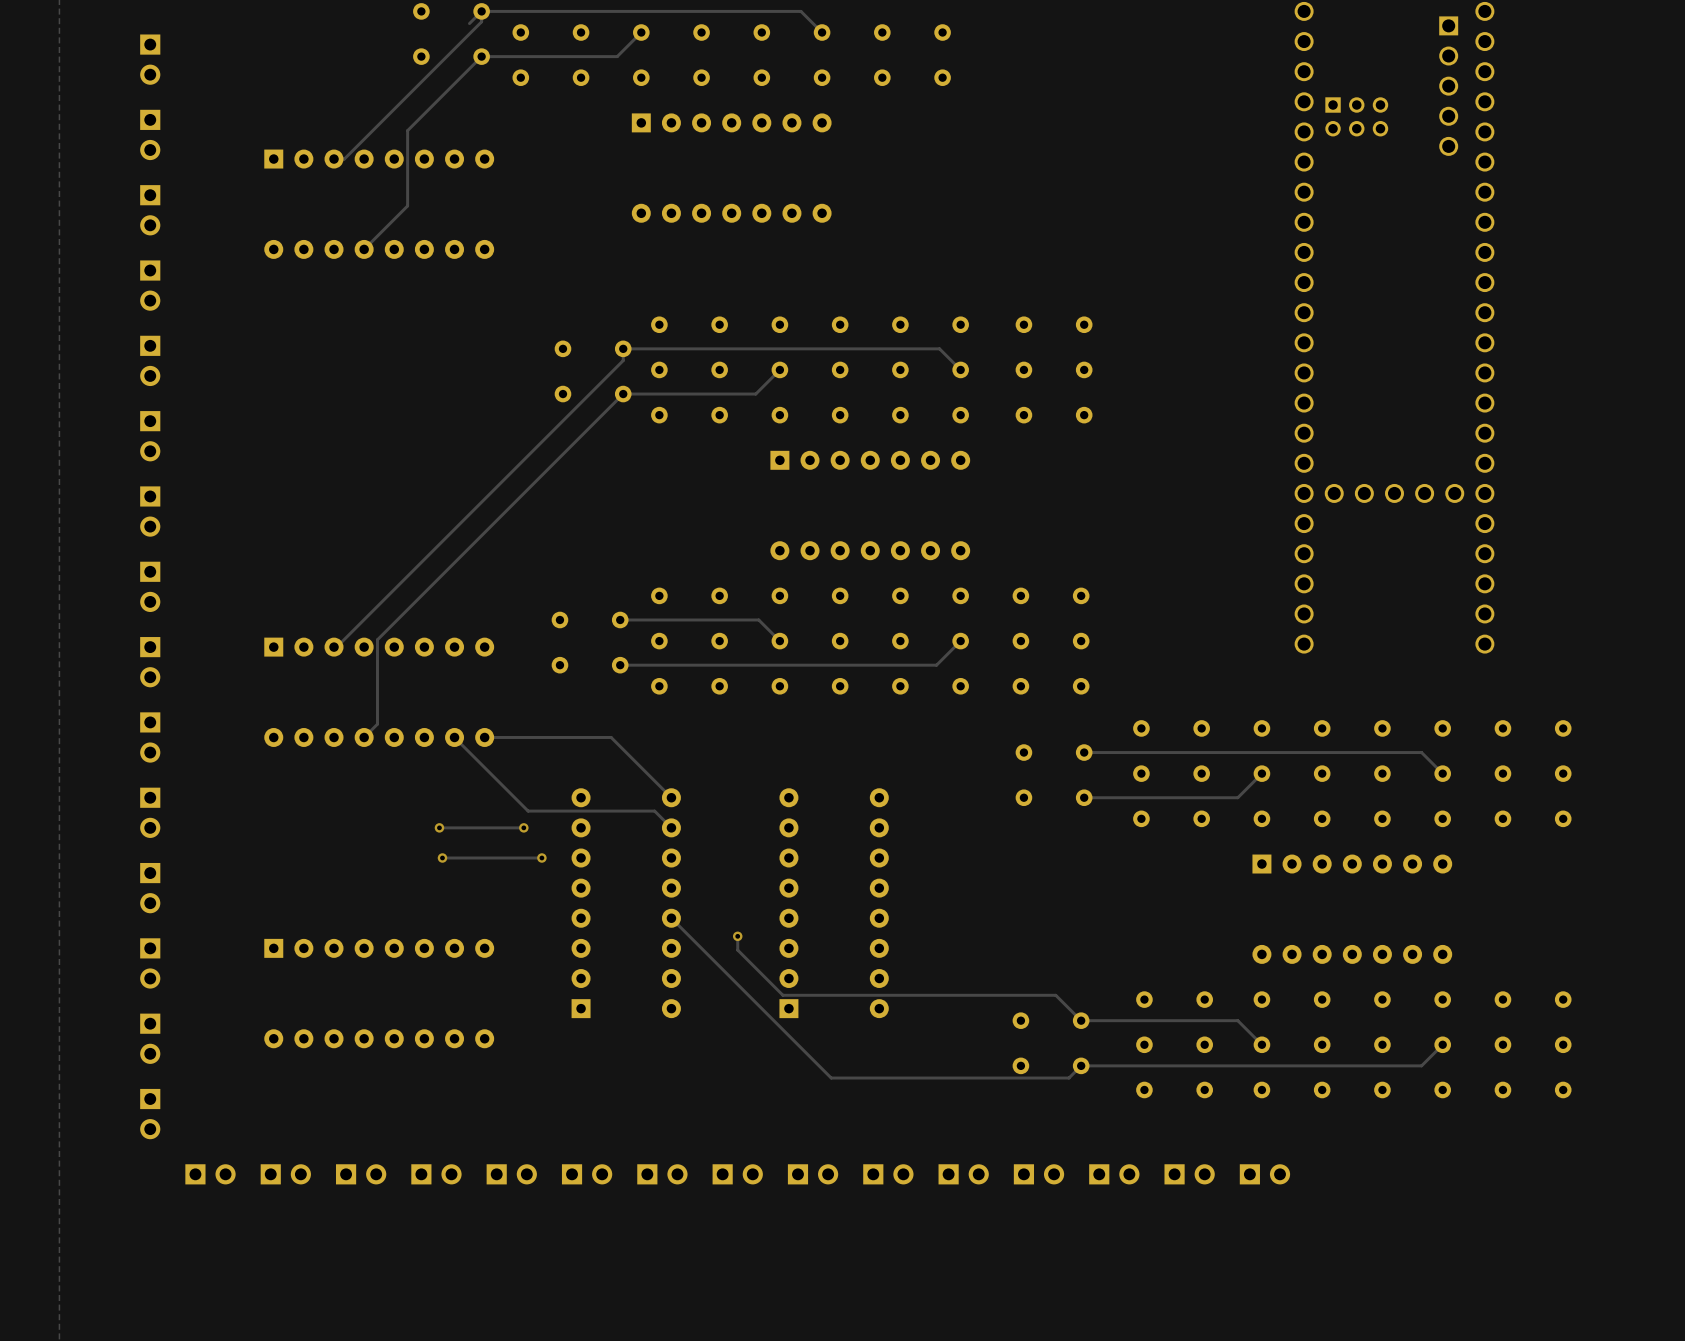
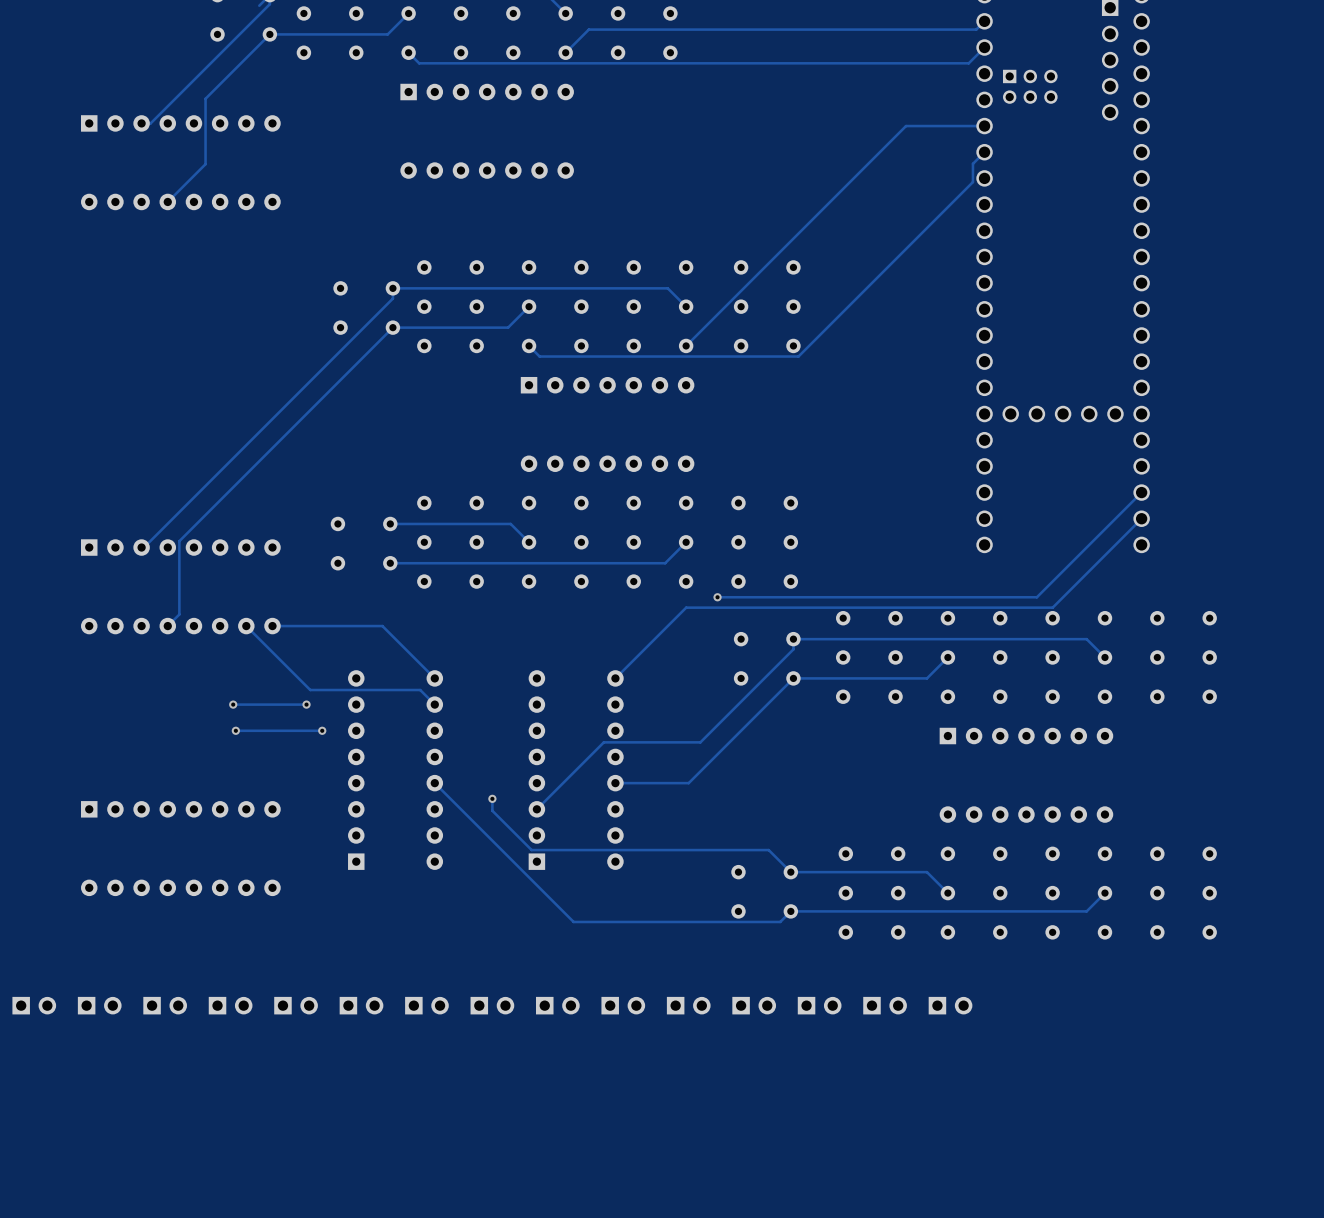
track: none -> (984, 21) (976, 29) (588, 29) (565, 52)
track: none -> (984, 47) (968, 63) (419, 63) (408, 52)
track: none -> (984, 126) (906, 126) (686, 345)
track: none -> (984, 152) (972, 163) (972, 182) (798, 356) (539, 356) (529, 345)
track: none -> (1141, 492) (1036, 597) (717, 597)
track: none -> (1141, 518) (1052, 607) (686, 607) (615, 678)
via: none -> (717, 597)
track: none -> (793, 639) (793, 649) (700, 742) (603, 742) (536, 809)
track: none -> (793, 678) (688, 783) (615, 783)

